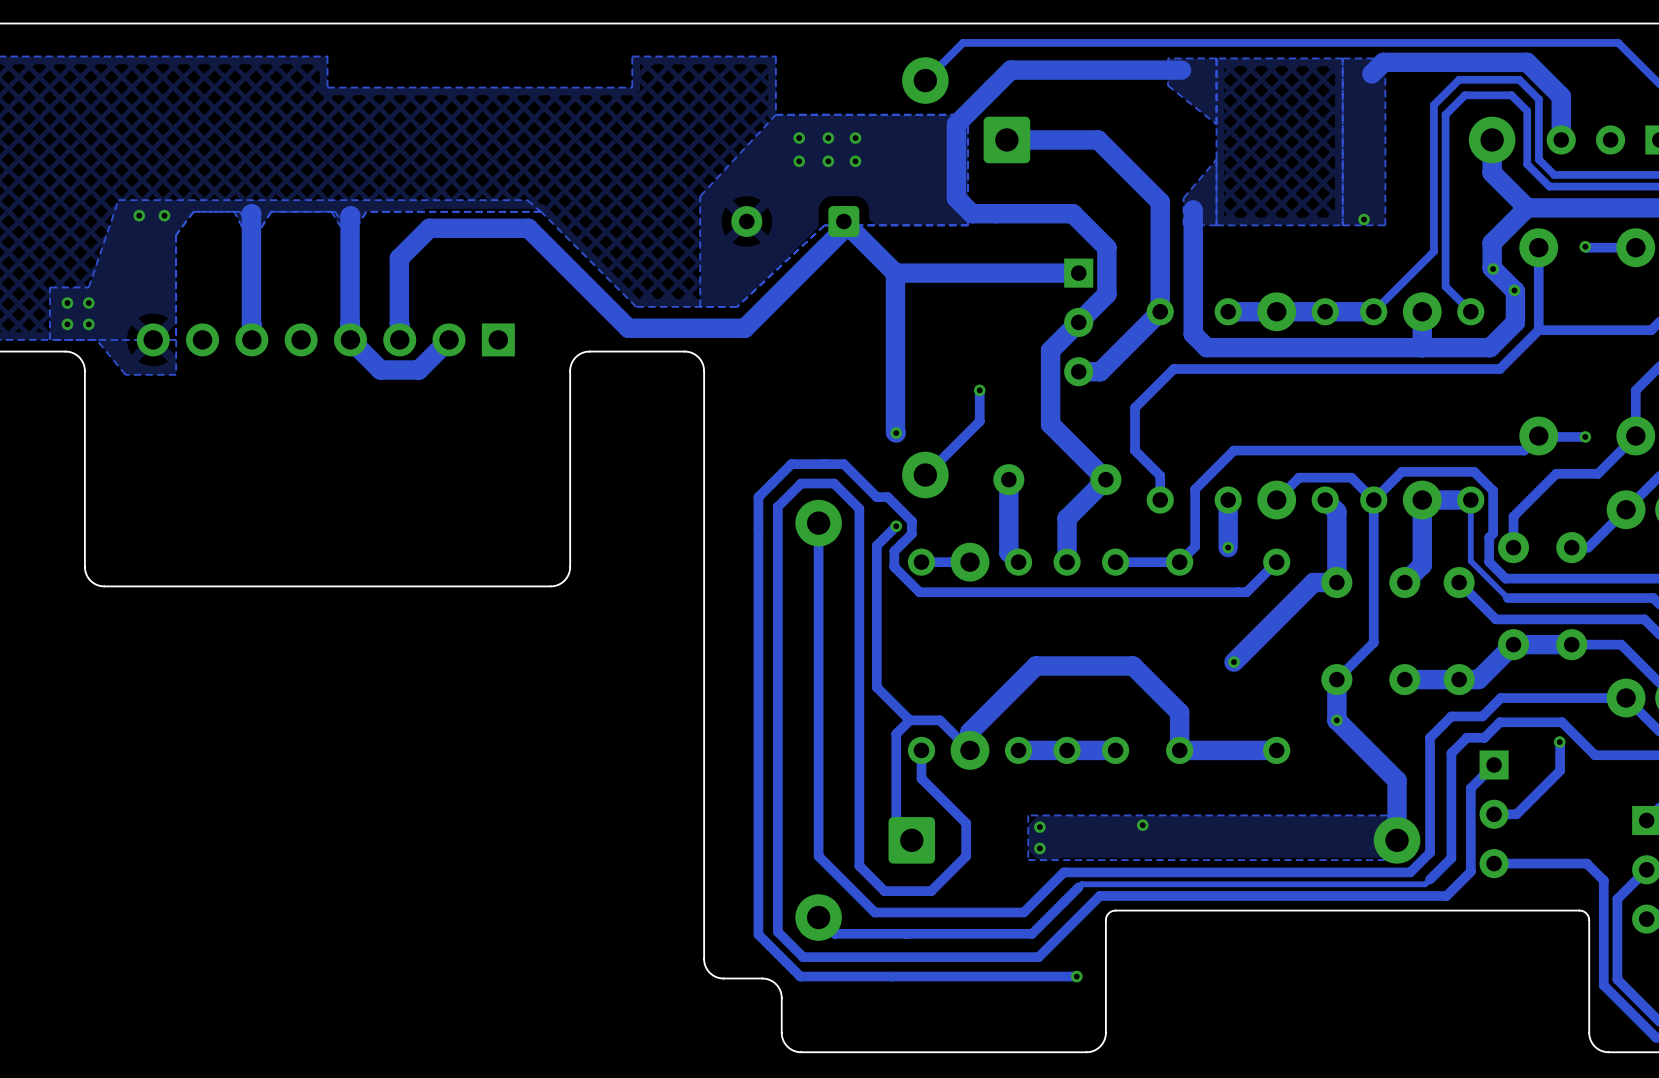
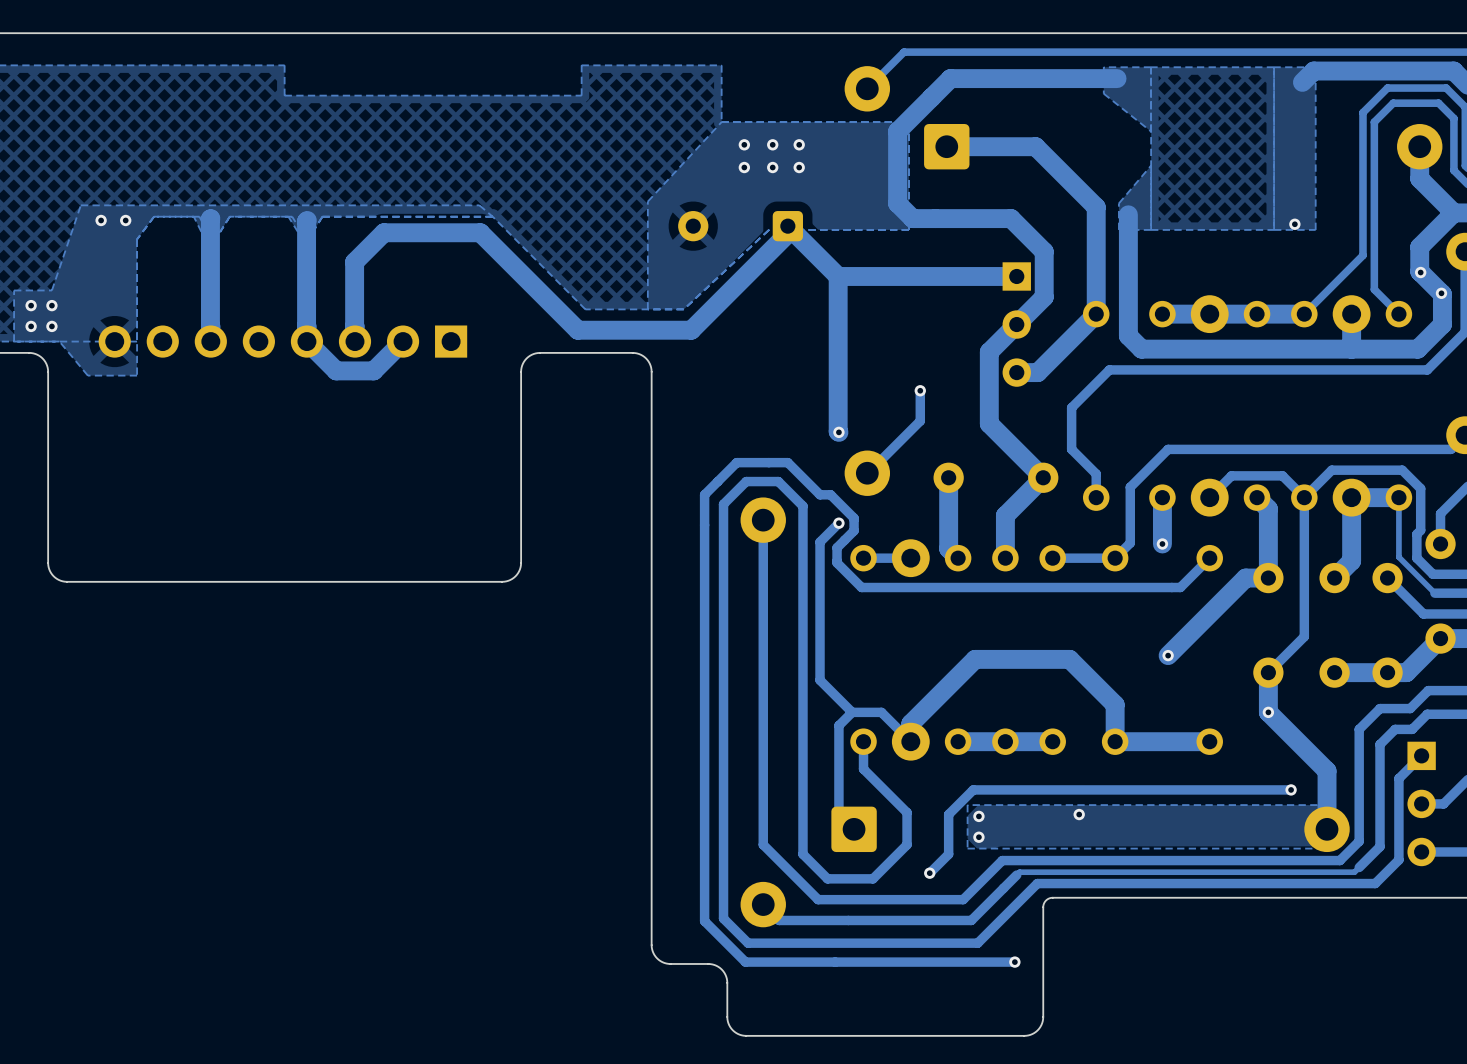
track: none -> (1291, 789) (973, 789) (948, 814) (948, 854) (929, 873)
via: none -> (1291, 789)
via: none -> (929, 873)

